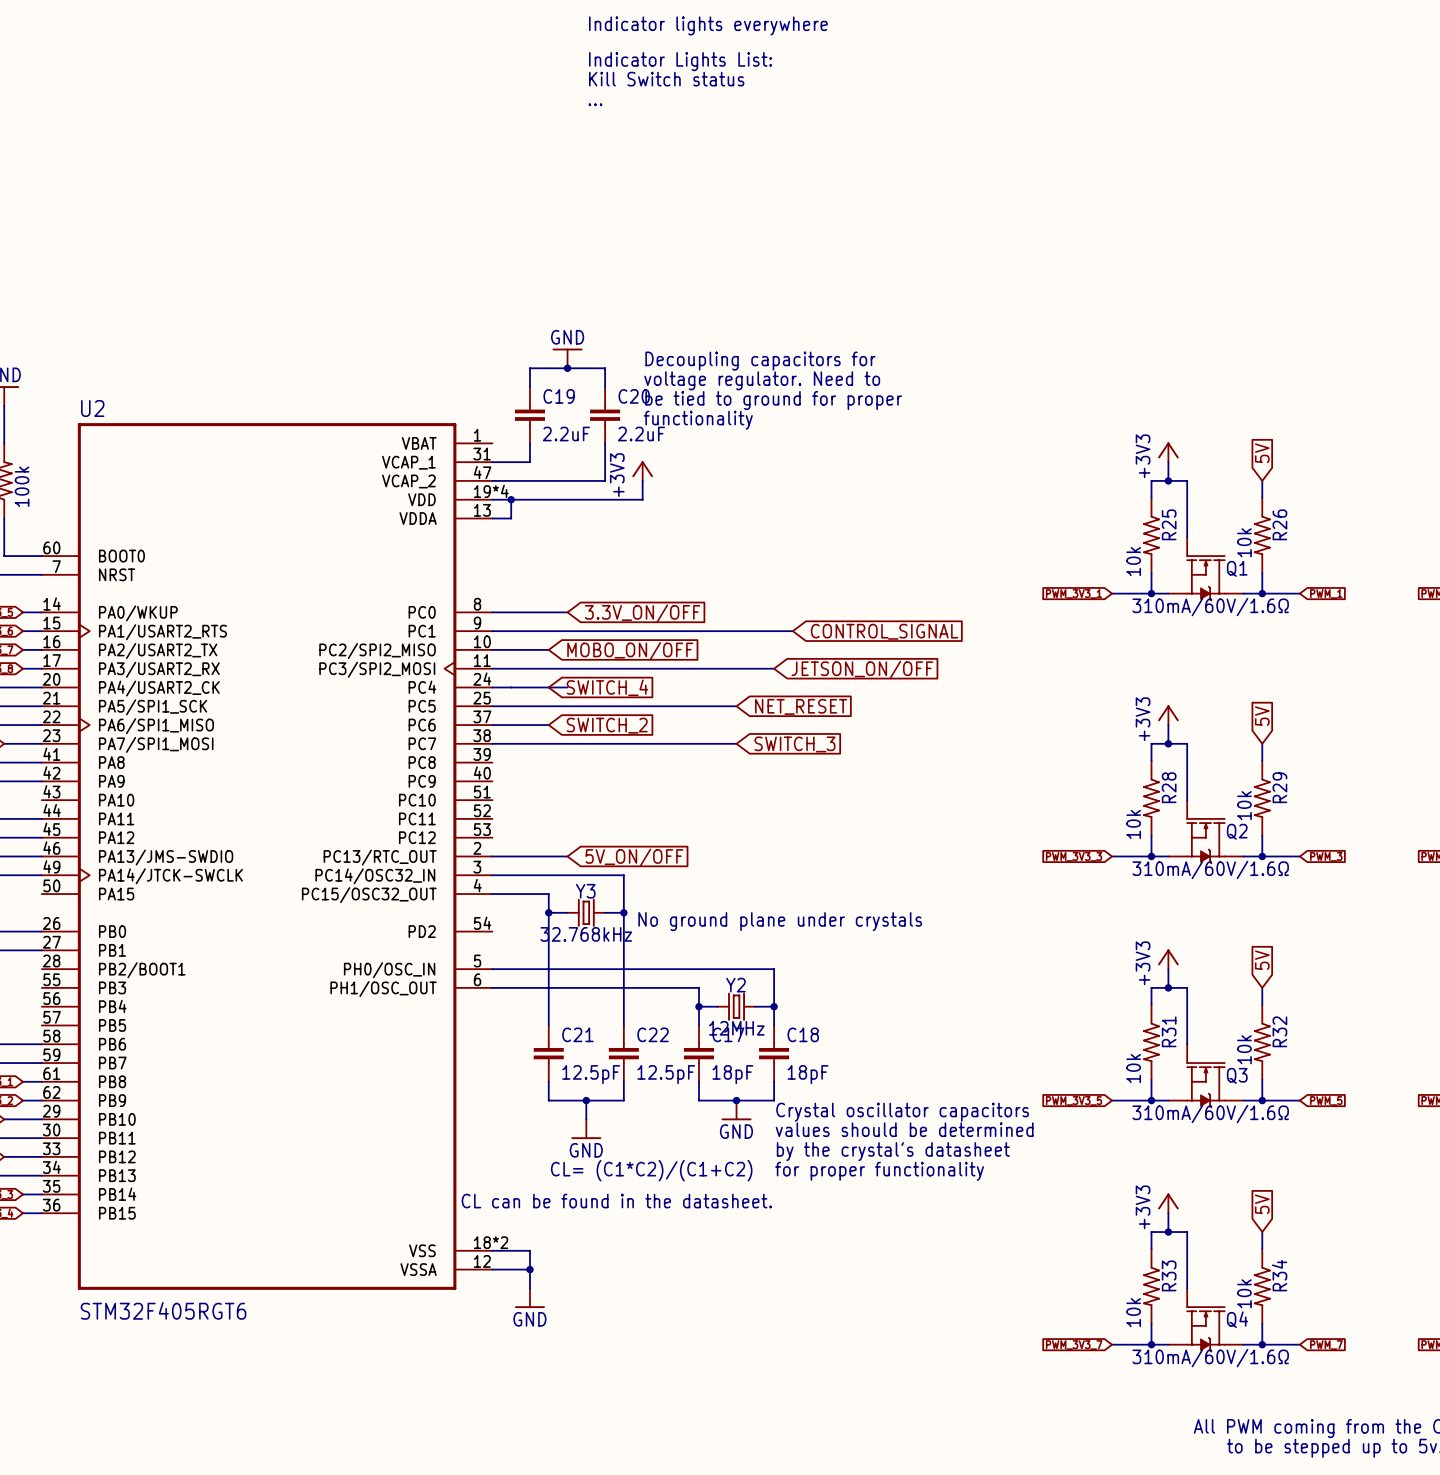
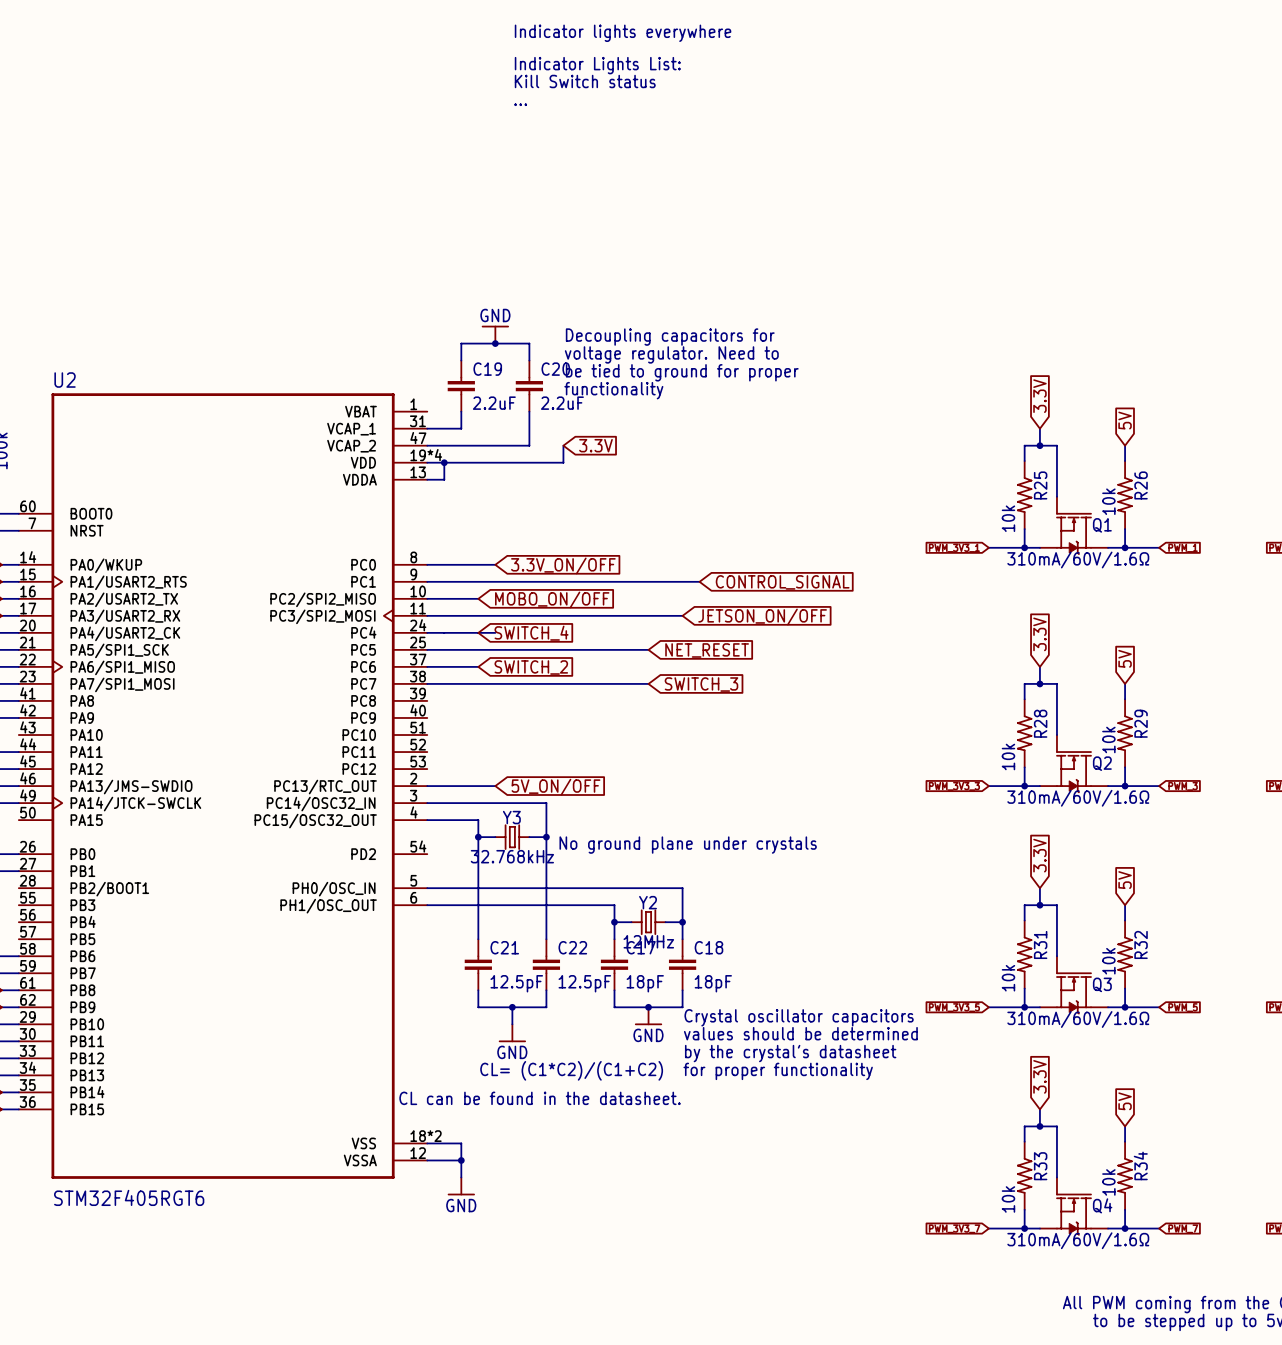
global label: none -> 3.3V (1039, 396)
power symbol: +3V3 (1168, 452) -> none
power symbol: +3V3 (642, 471) -> none
global label: none -> 3.3V (595, 445)
global label: none -> 3.3V (1039, 634)
power symbol: +3V3 (1168, 715) -> none
global label: none -> 3.3V (1039, 855)
power symbol: +3V3 (1168, 959) -> none
global label: none -> 3.3V (1039, 1076)
power symbol: +3V3 (1168, 1203) -> none

